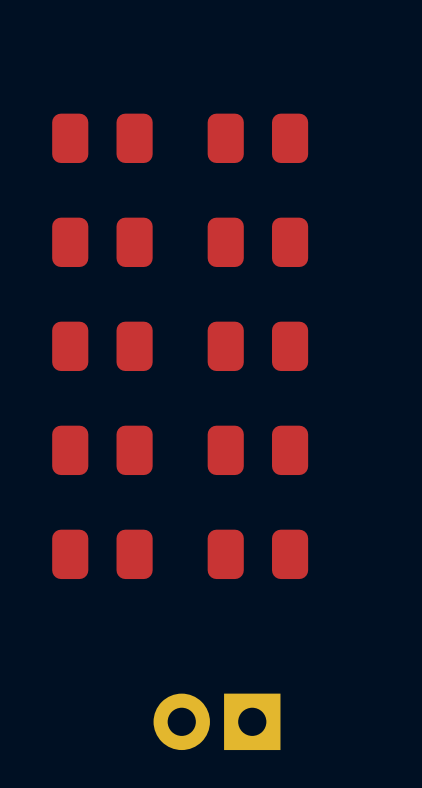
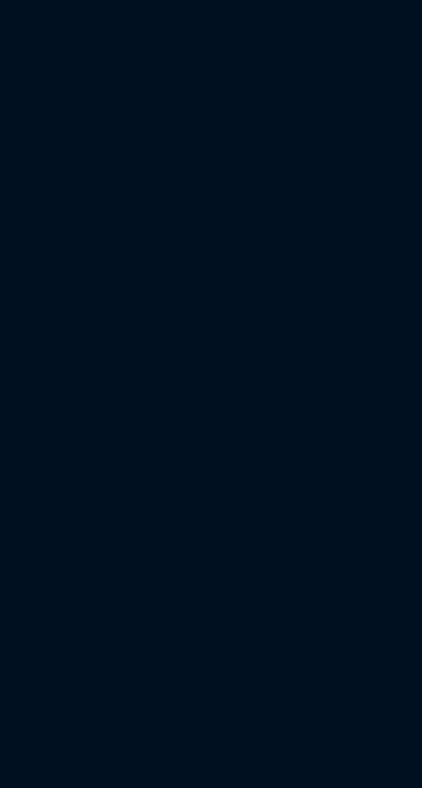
part: (102, 138) -> none
part: (257, 138) -> none
part: (102, 242) -> none
part: (257, 242) -> none
part: (102, 346) -> none
part: (257, 346) -> none
part: (102, 450) -> none
part: (257, 450) -> none
part: (102, 554) -> none
part: (257, 554) -> none
part: (217, 721) -> none

